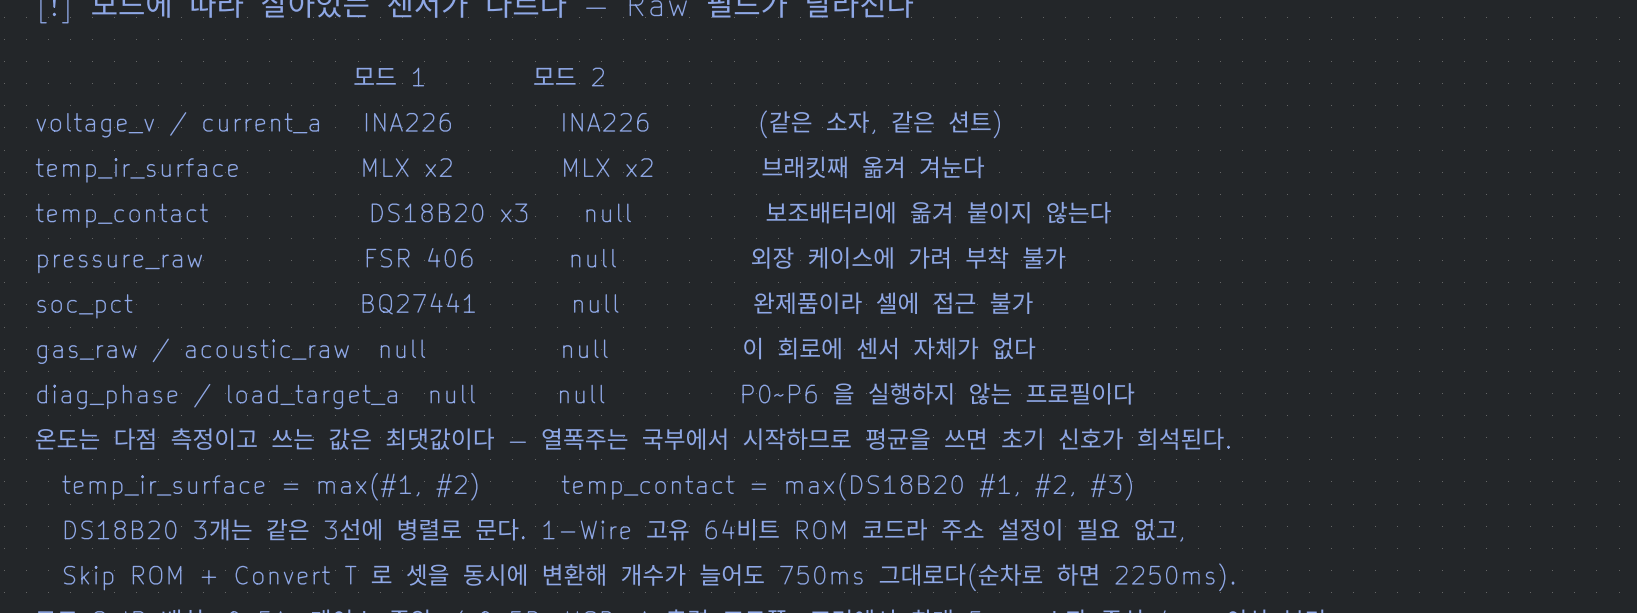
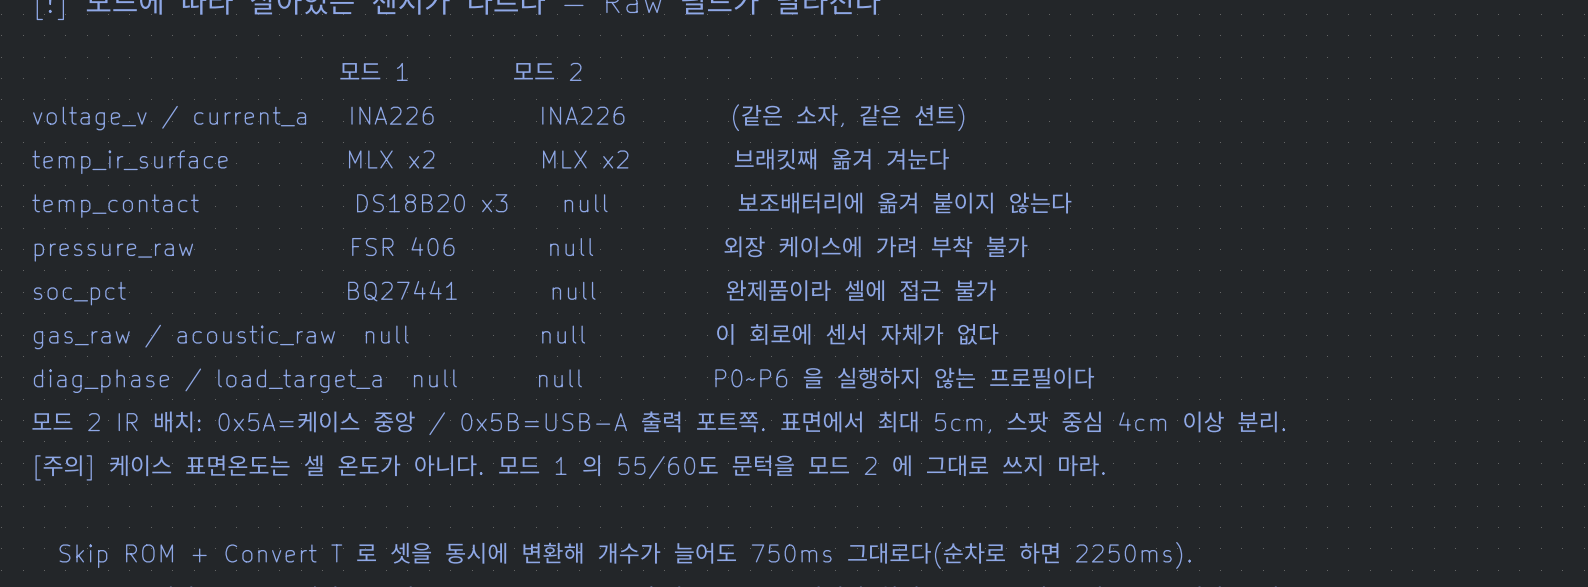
text: 온도는 다점 측정이고 쓰는 값은 최댓값이다 — 열폭주는 국부에서 시작하므로 평균을 쓰면 초기 신호가 희석된다. (632, 439) -> 모드 2 IR 배치: 0x5A=케이스 중앙 / 0x5B=USB-A 출력 포트쪽. 표면에서 최대 5cm, 스팟 중심 4cm 이상 분리. (658, 422)
text: temp_ir_surface = max(#1, #2) temp_contact = max(DS18B20 #1, #2, #3) (597, 486) -> [주의] 케이스 표면온도는 셀 온도가 아니다. 모드 1 의 55/60도 문턱을 모드 2 에 그대로 쓰지 마라. (570, 467)
text: DS18B20 3개는 같은 3선에 병렬로 문다. 1-Wire 고유 64비트 ROM 코드라 주소 설정이 필요 없고, (623, 530) -> none

